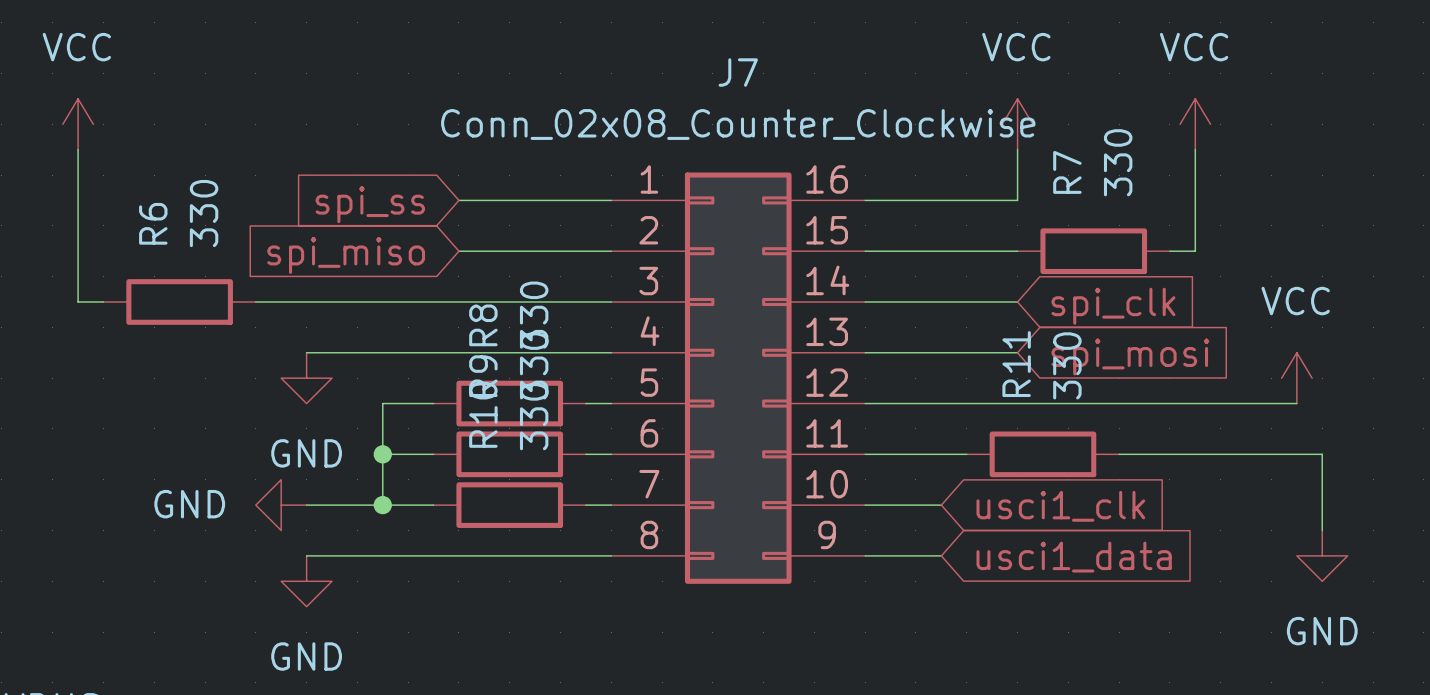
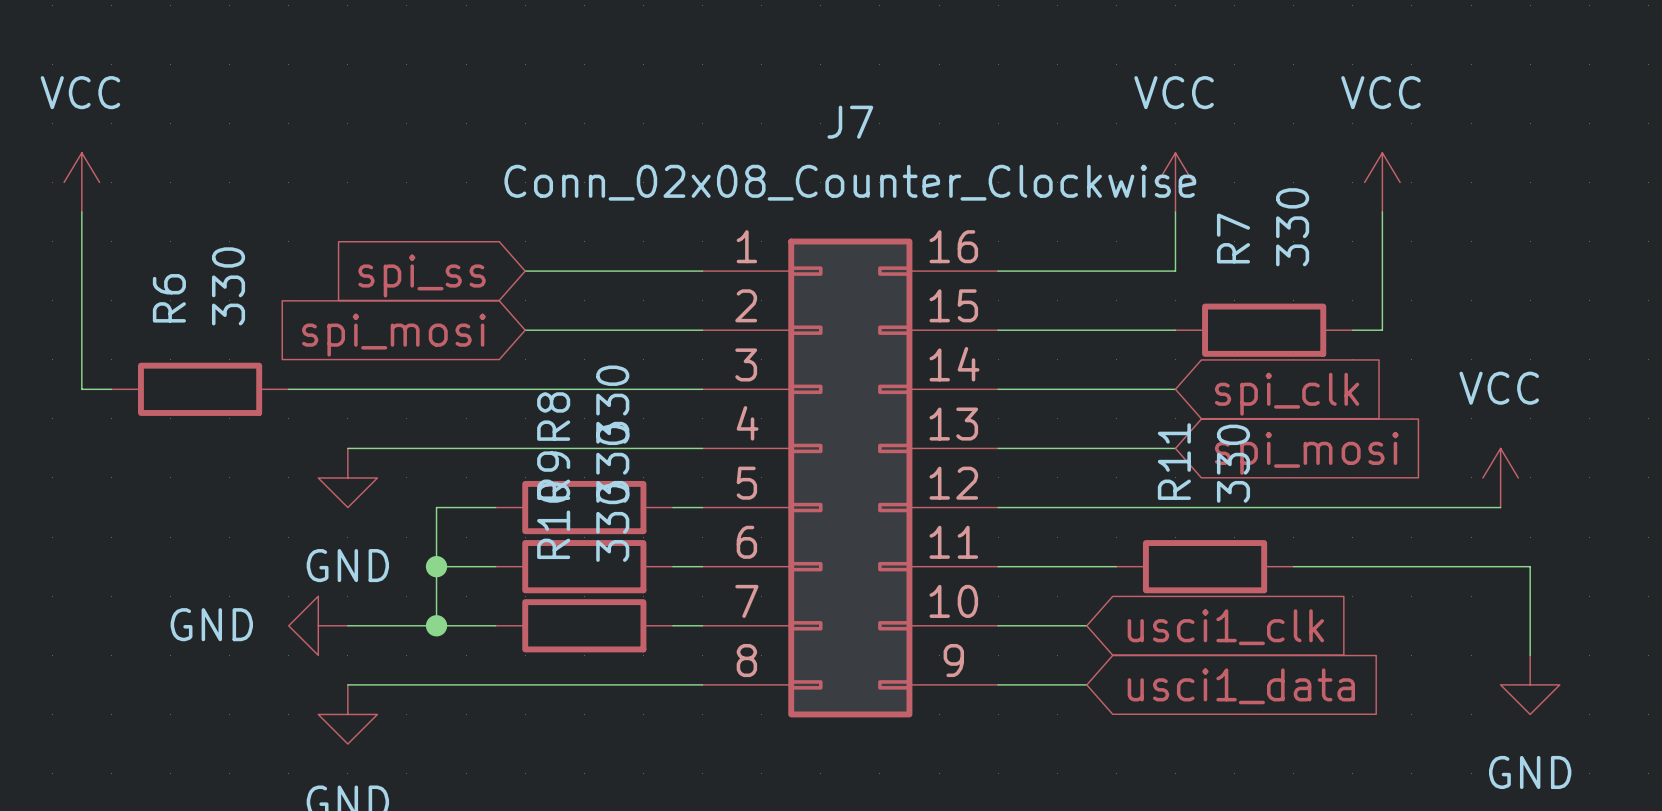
global label: spi_miso (346, 255) -> spi_mosi (393, 335)

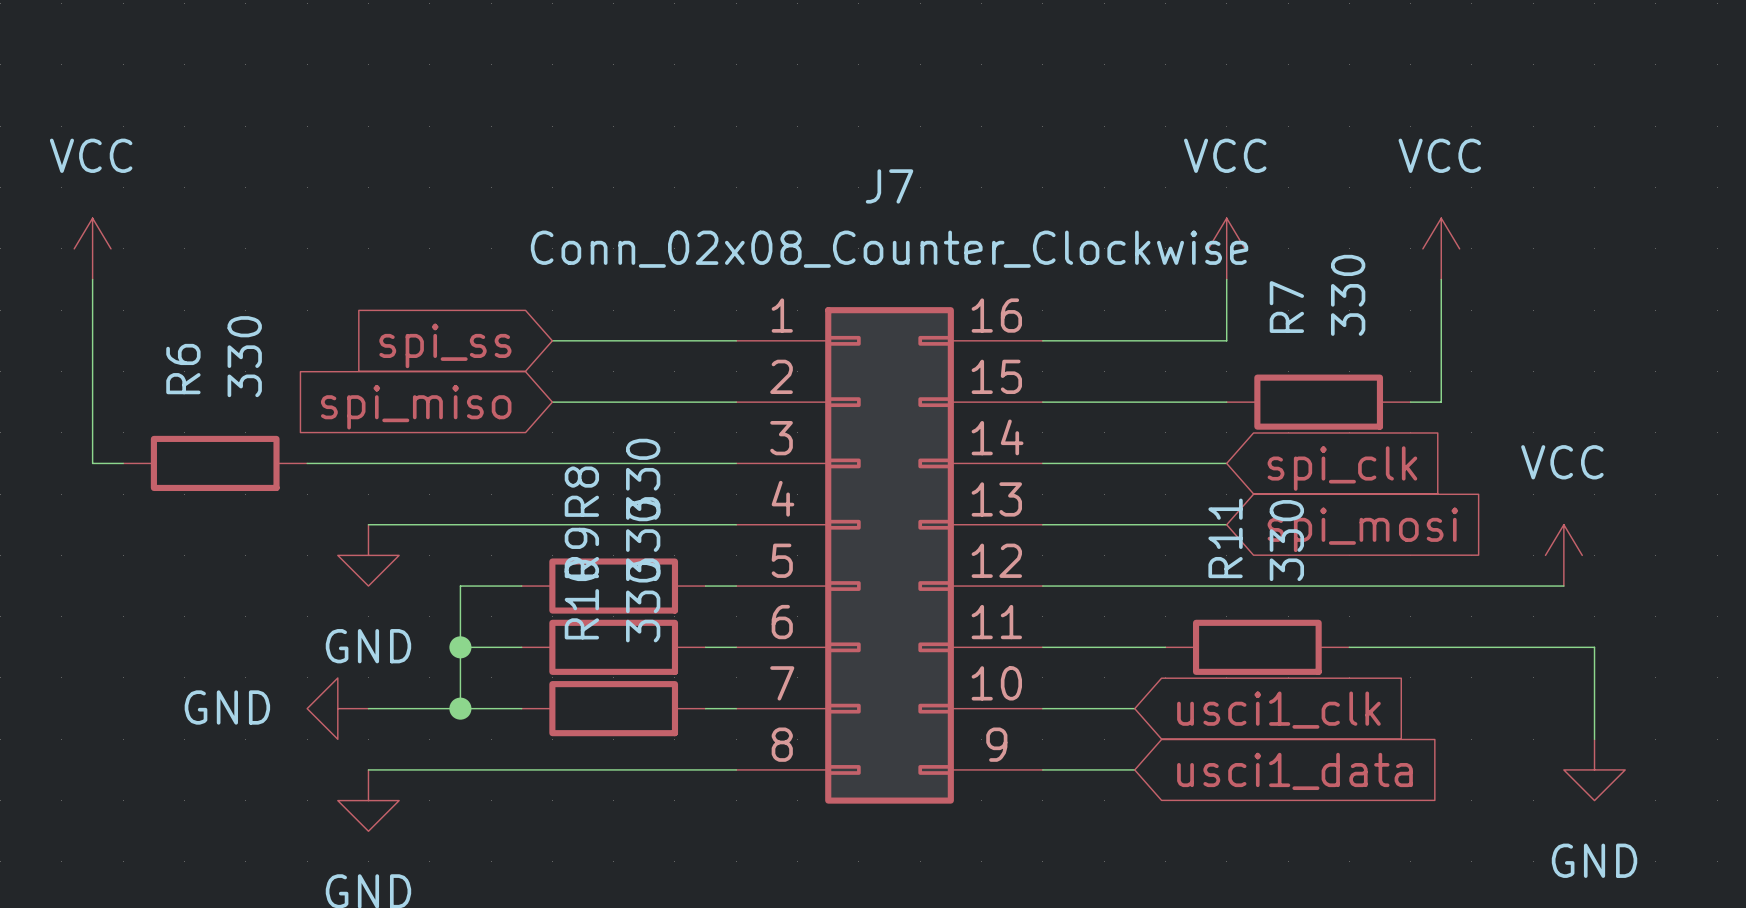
global label: spi_mosi (393, 335) -> spi_miso (416, 407)

